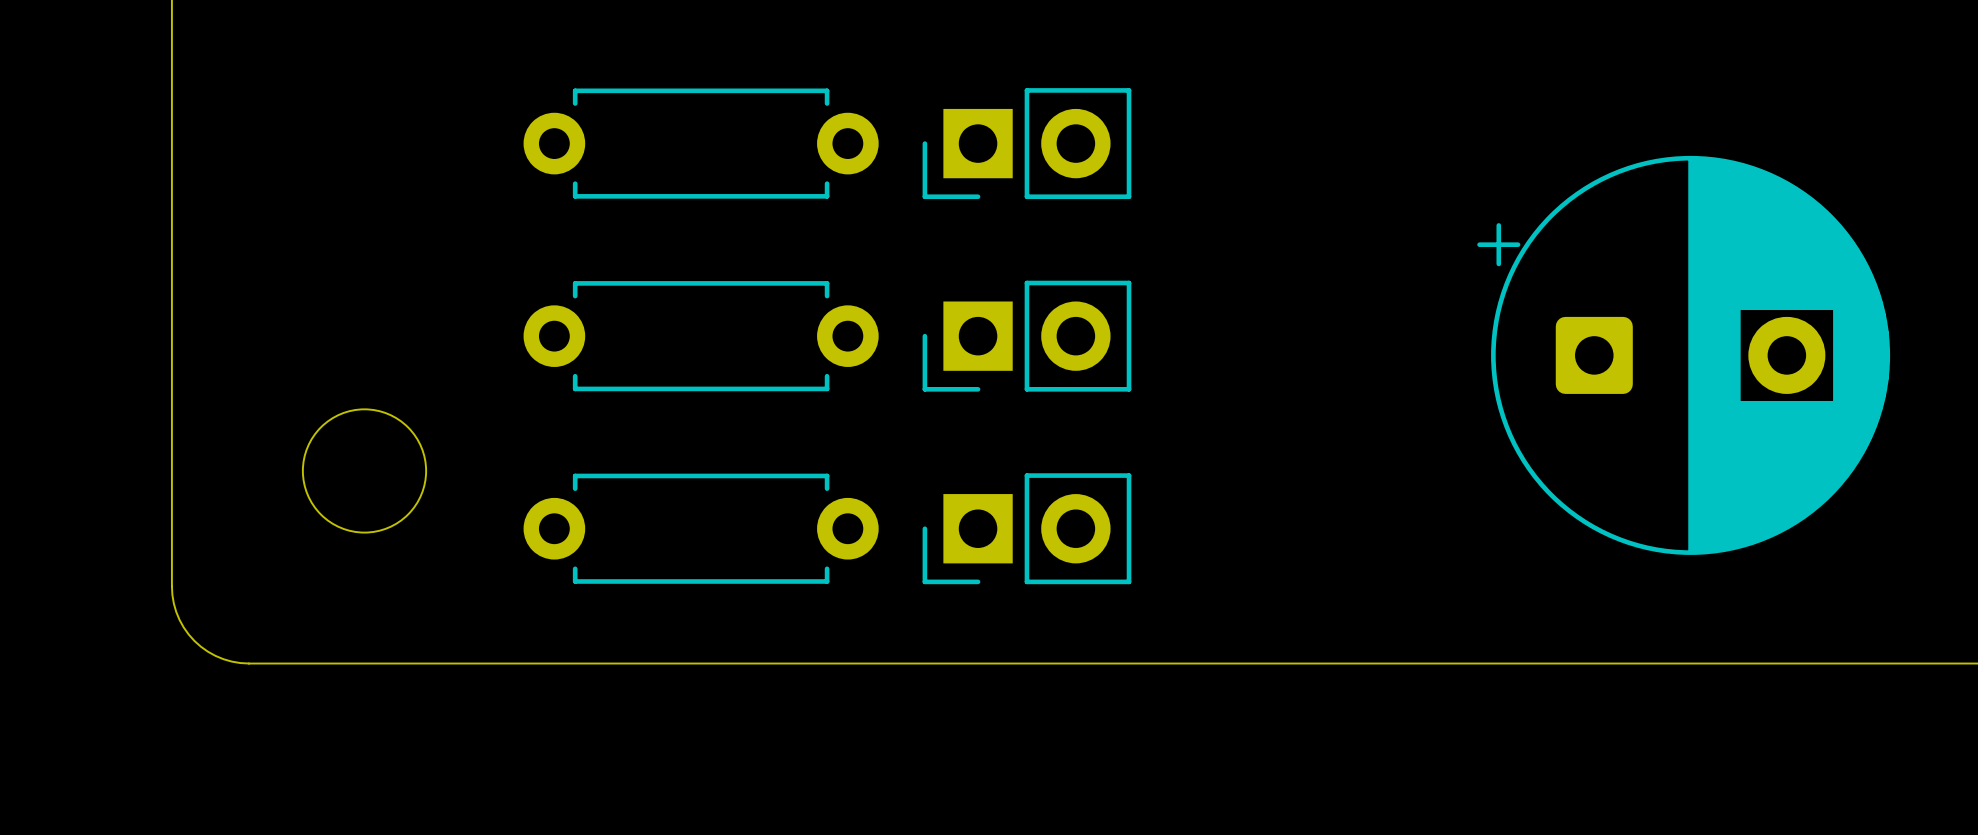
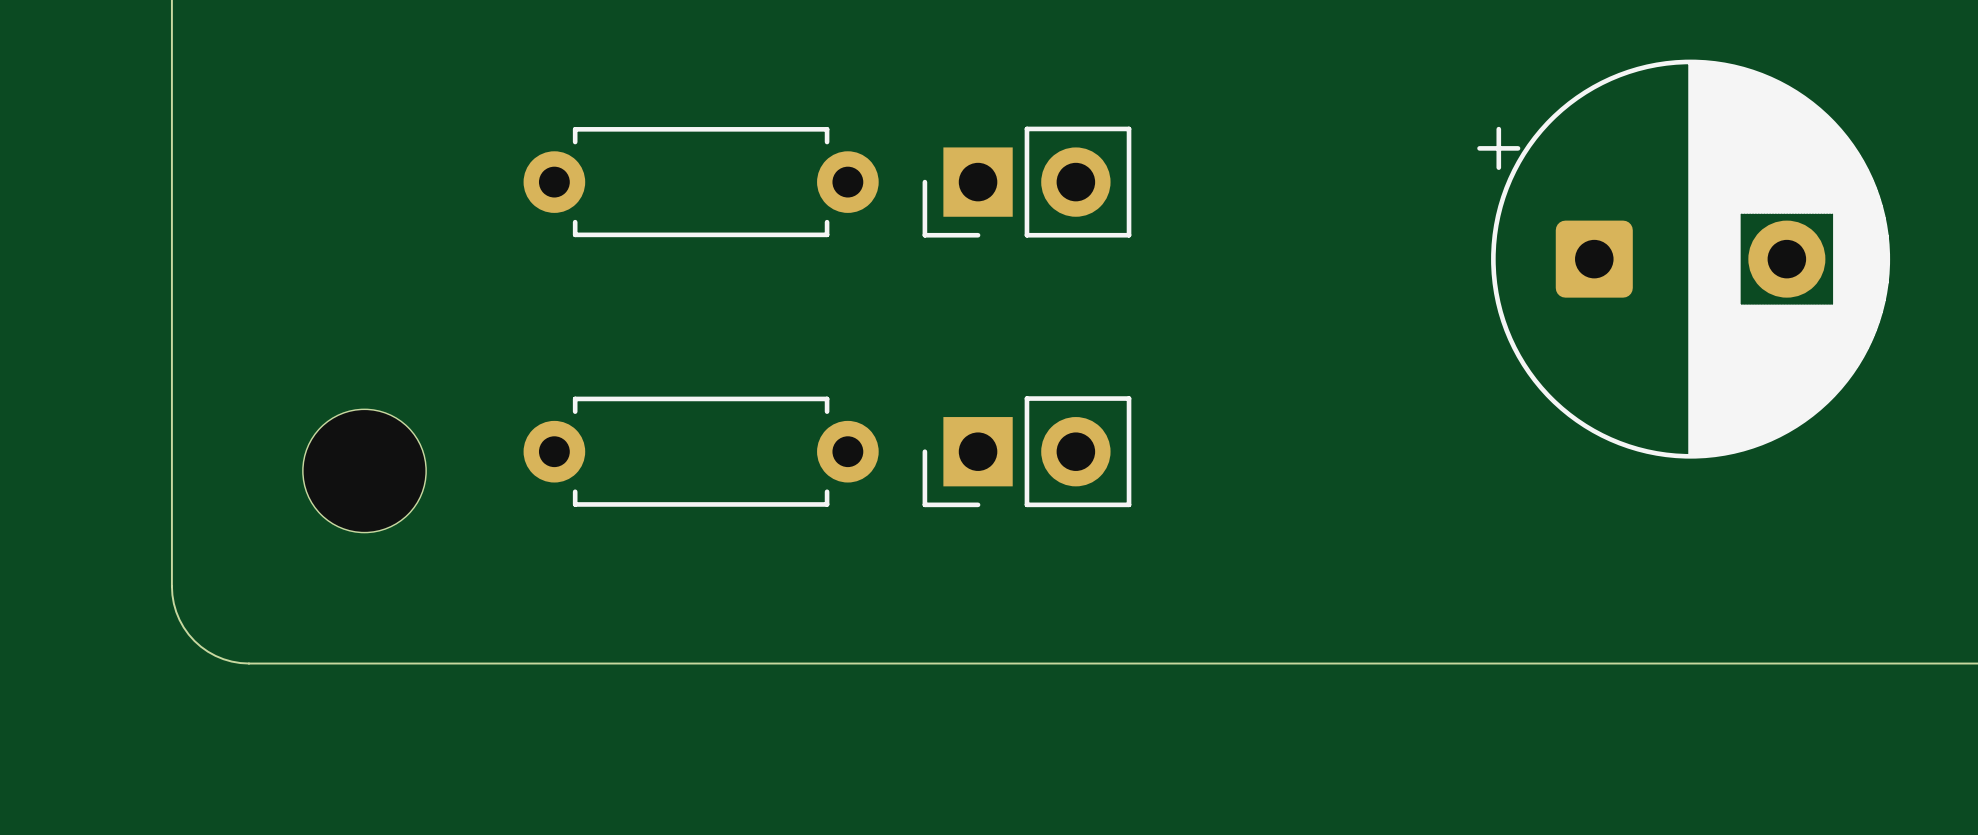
part position: (701, 143) -> (701, 182)
part position: (1026, 143) -> (1026, 182)
part: (701, 336) -> none
part: (1026, 336) -> none
part position: (1683, 355) -> (1683, 259)
part: none -> (701, 451)
part: none -> (1026, 451)
part: (701, 528) -> none
part: (1026, 528) -> none

